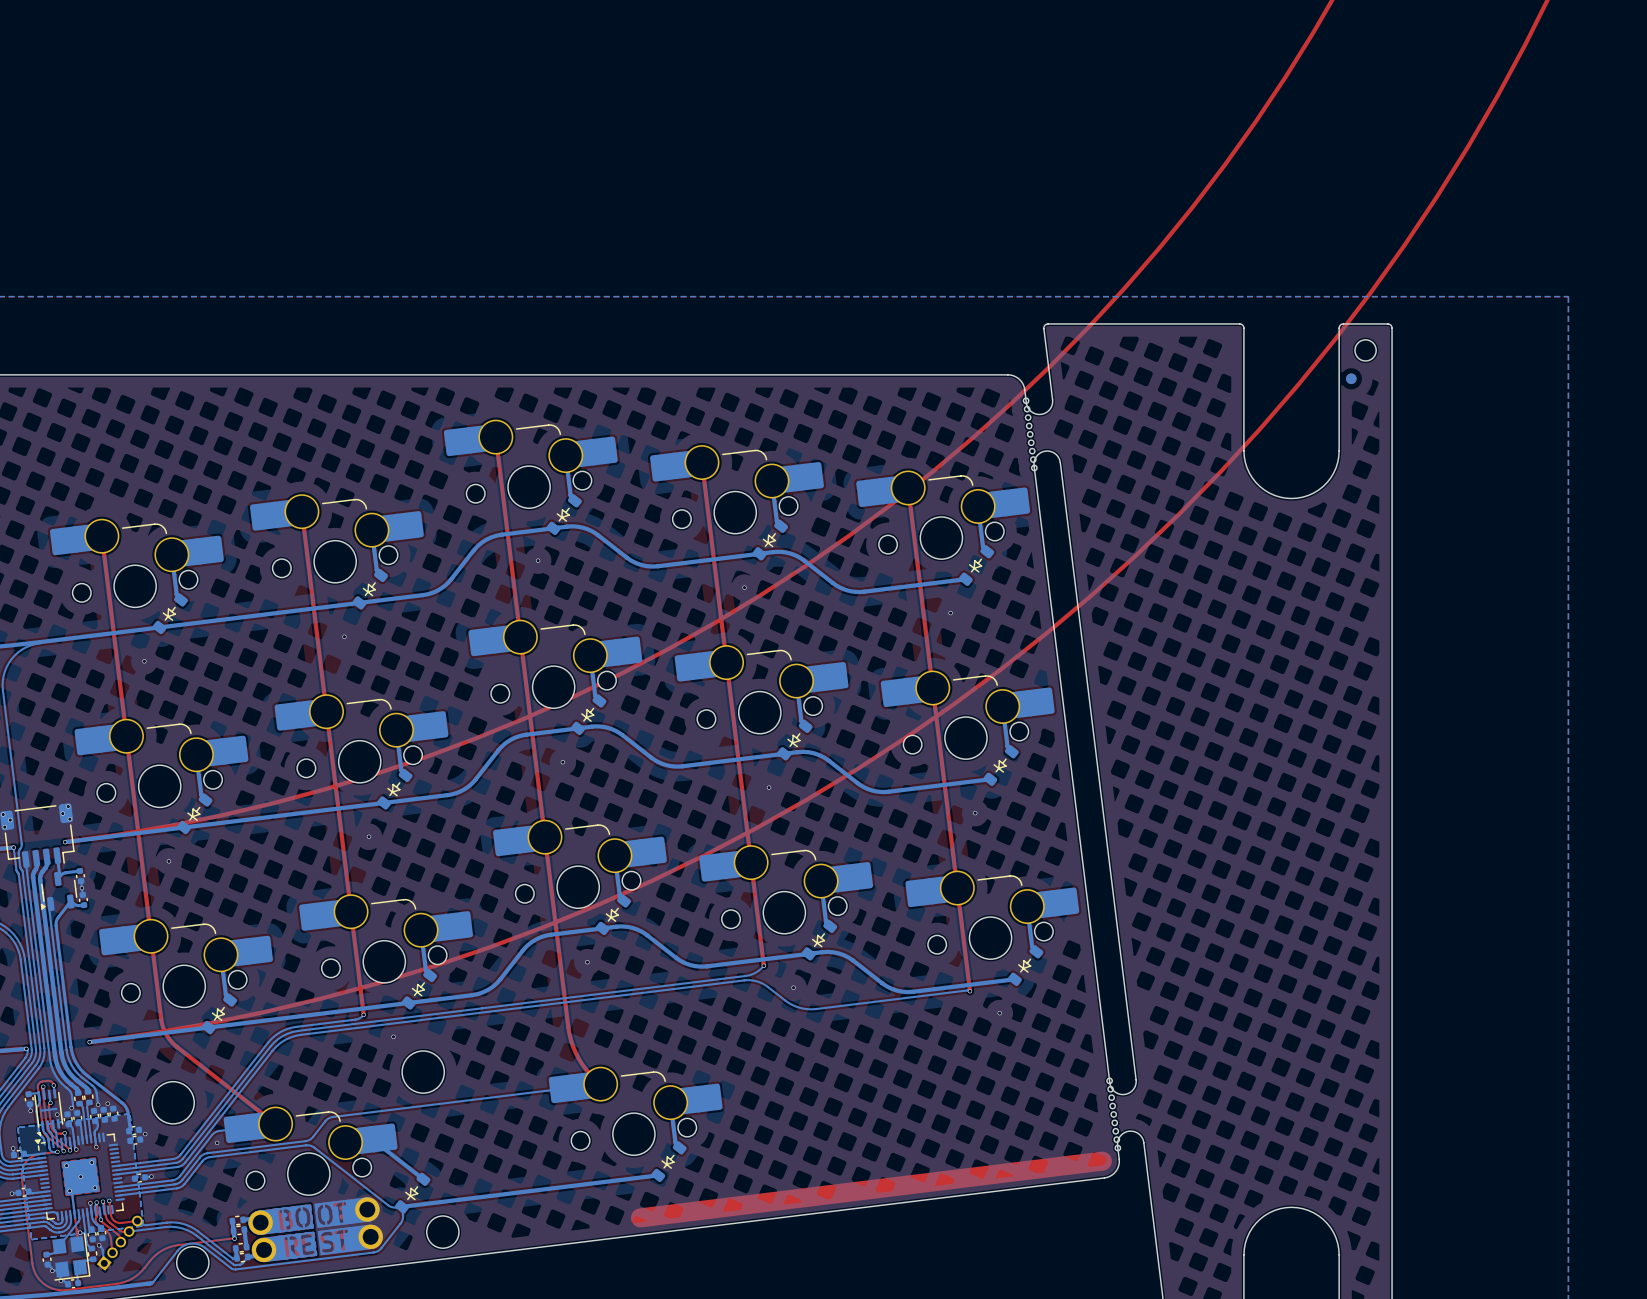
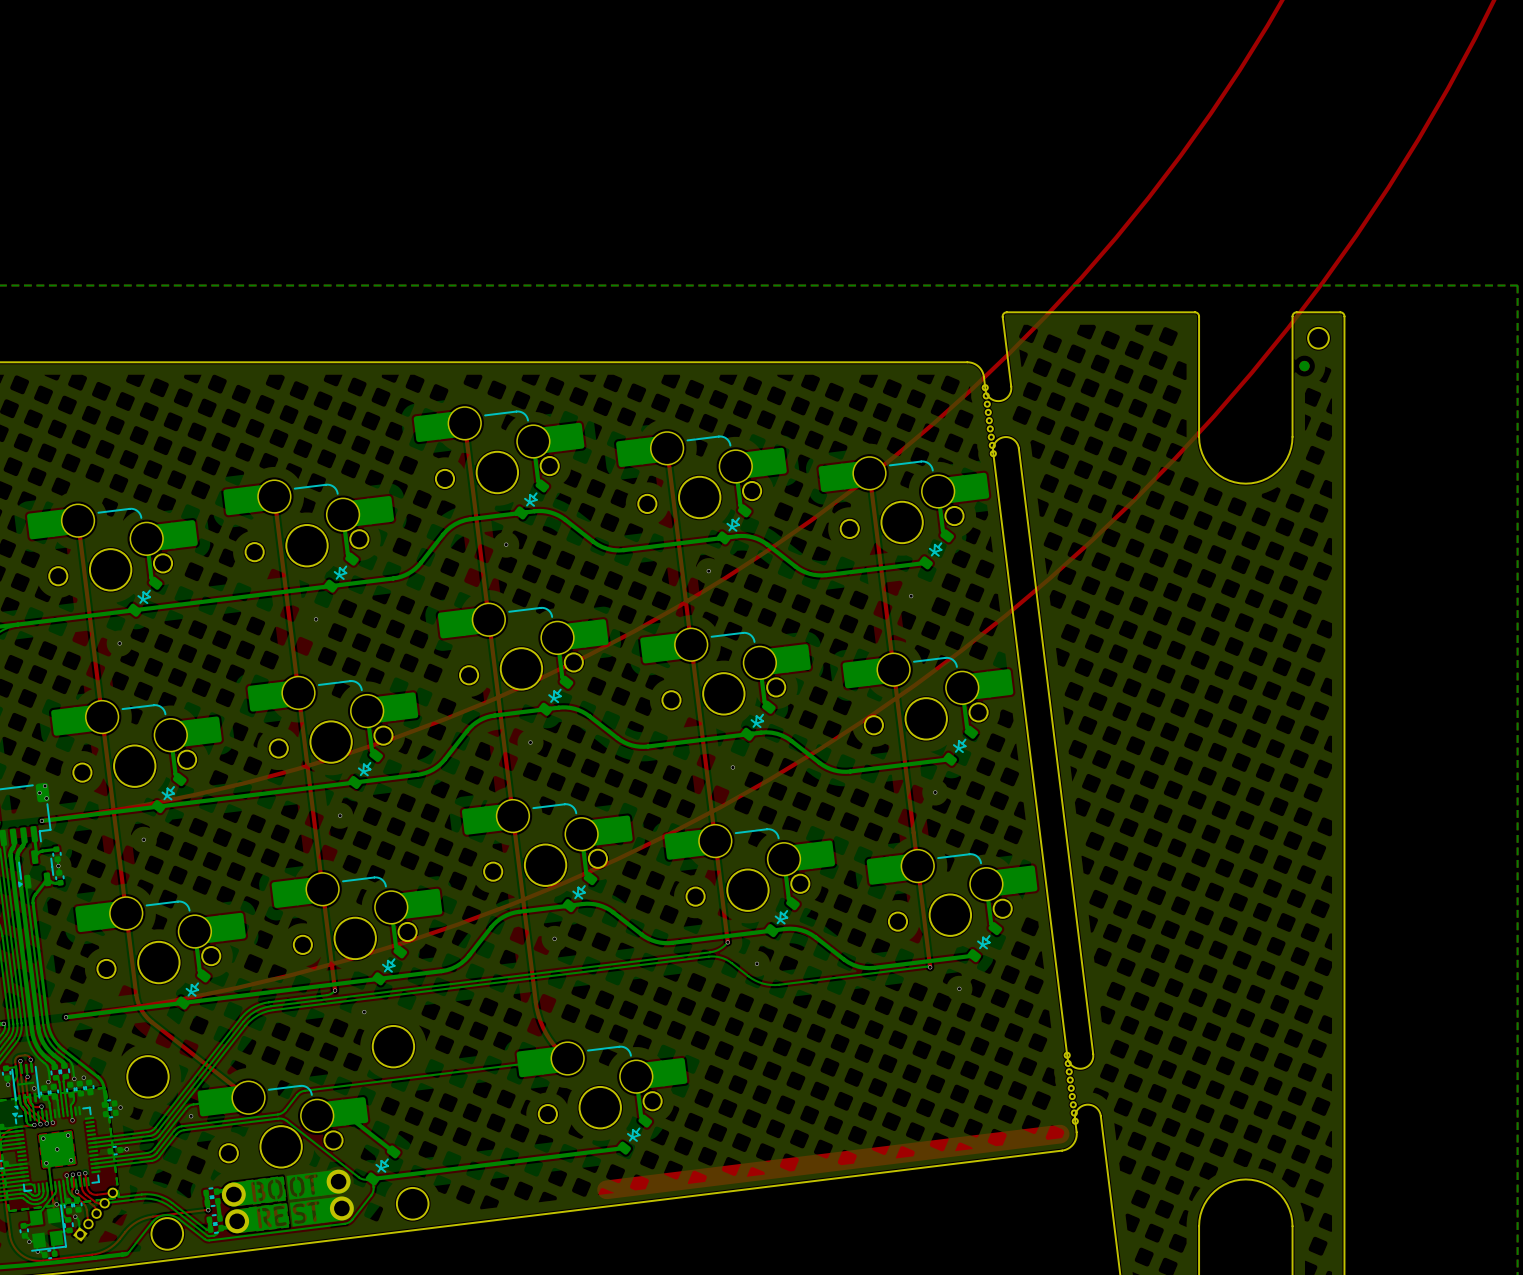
bottom track: (38, 1131) (44, 1144) -> none

